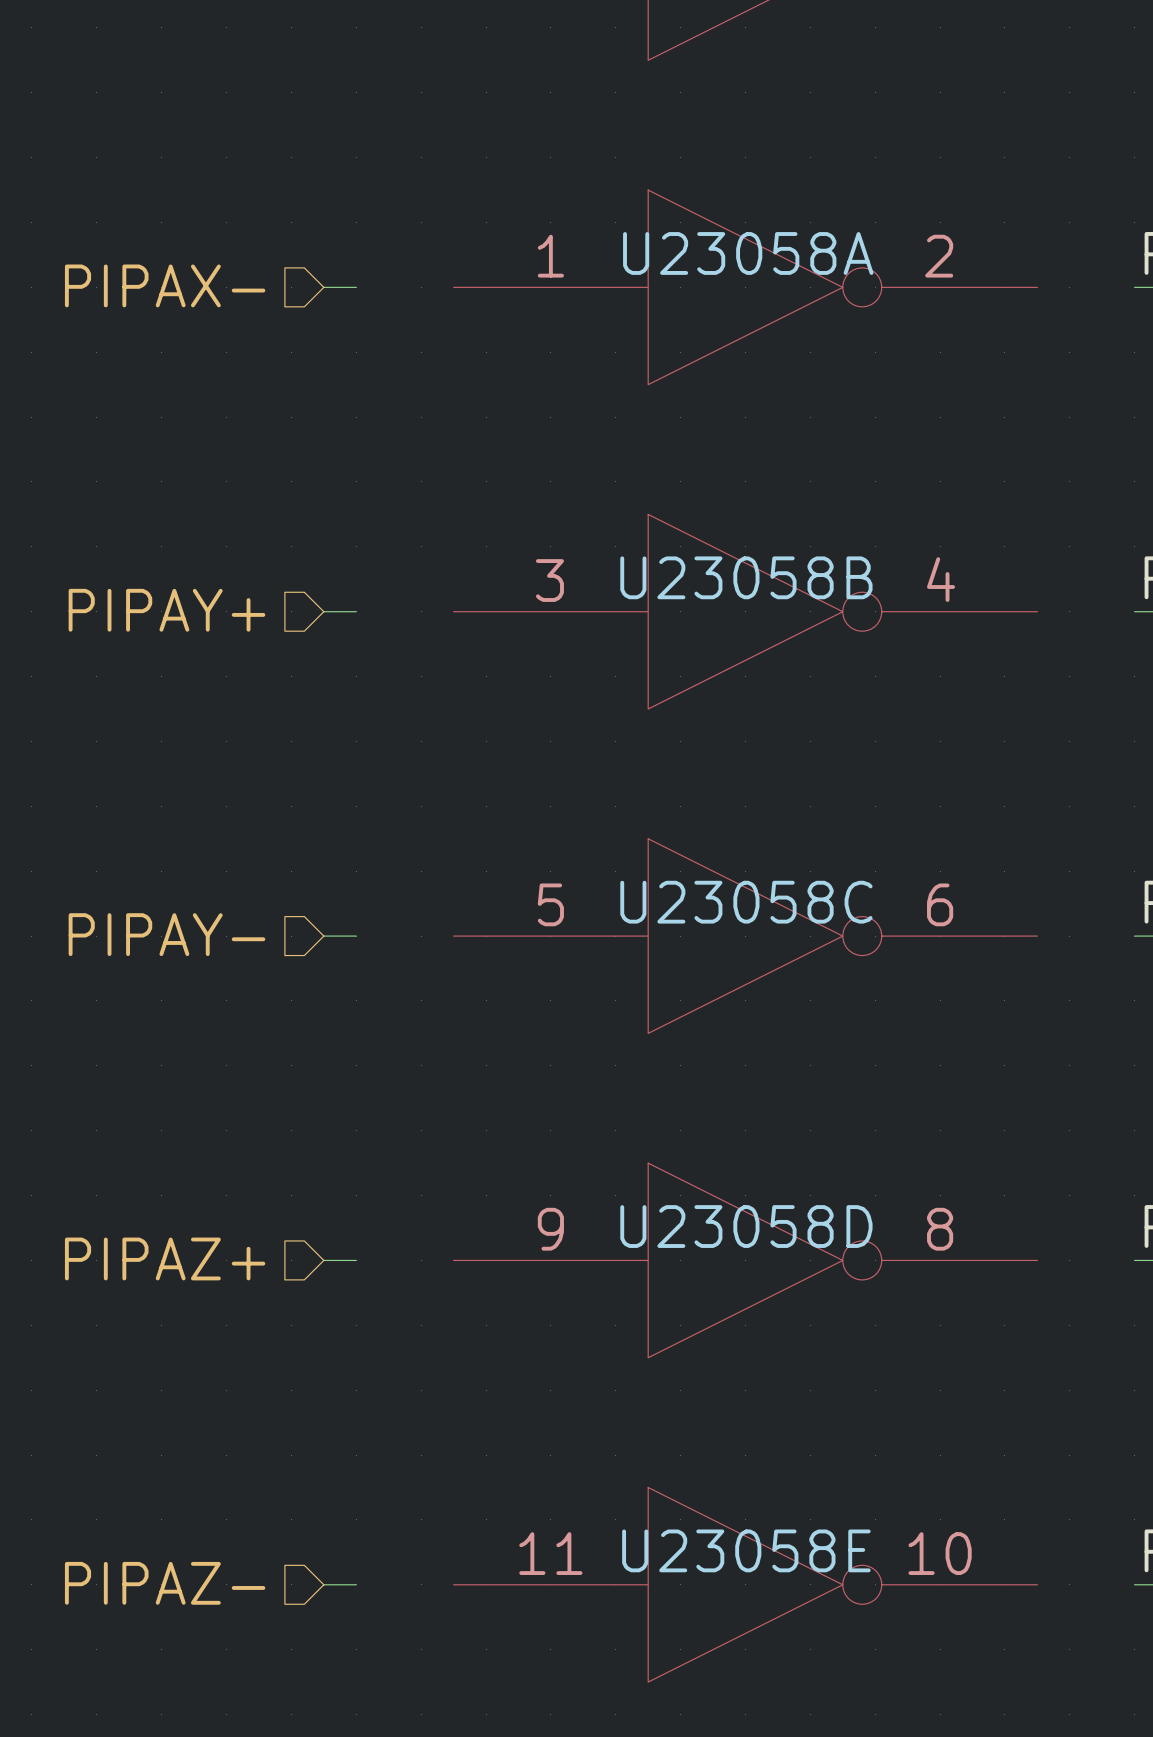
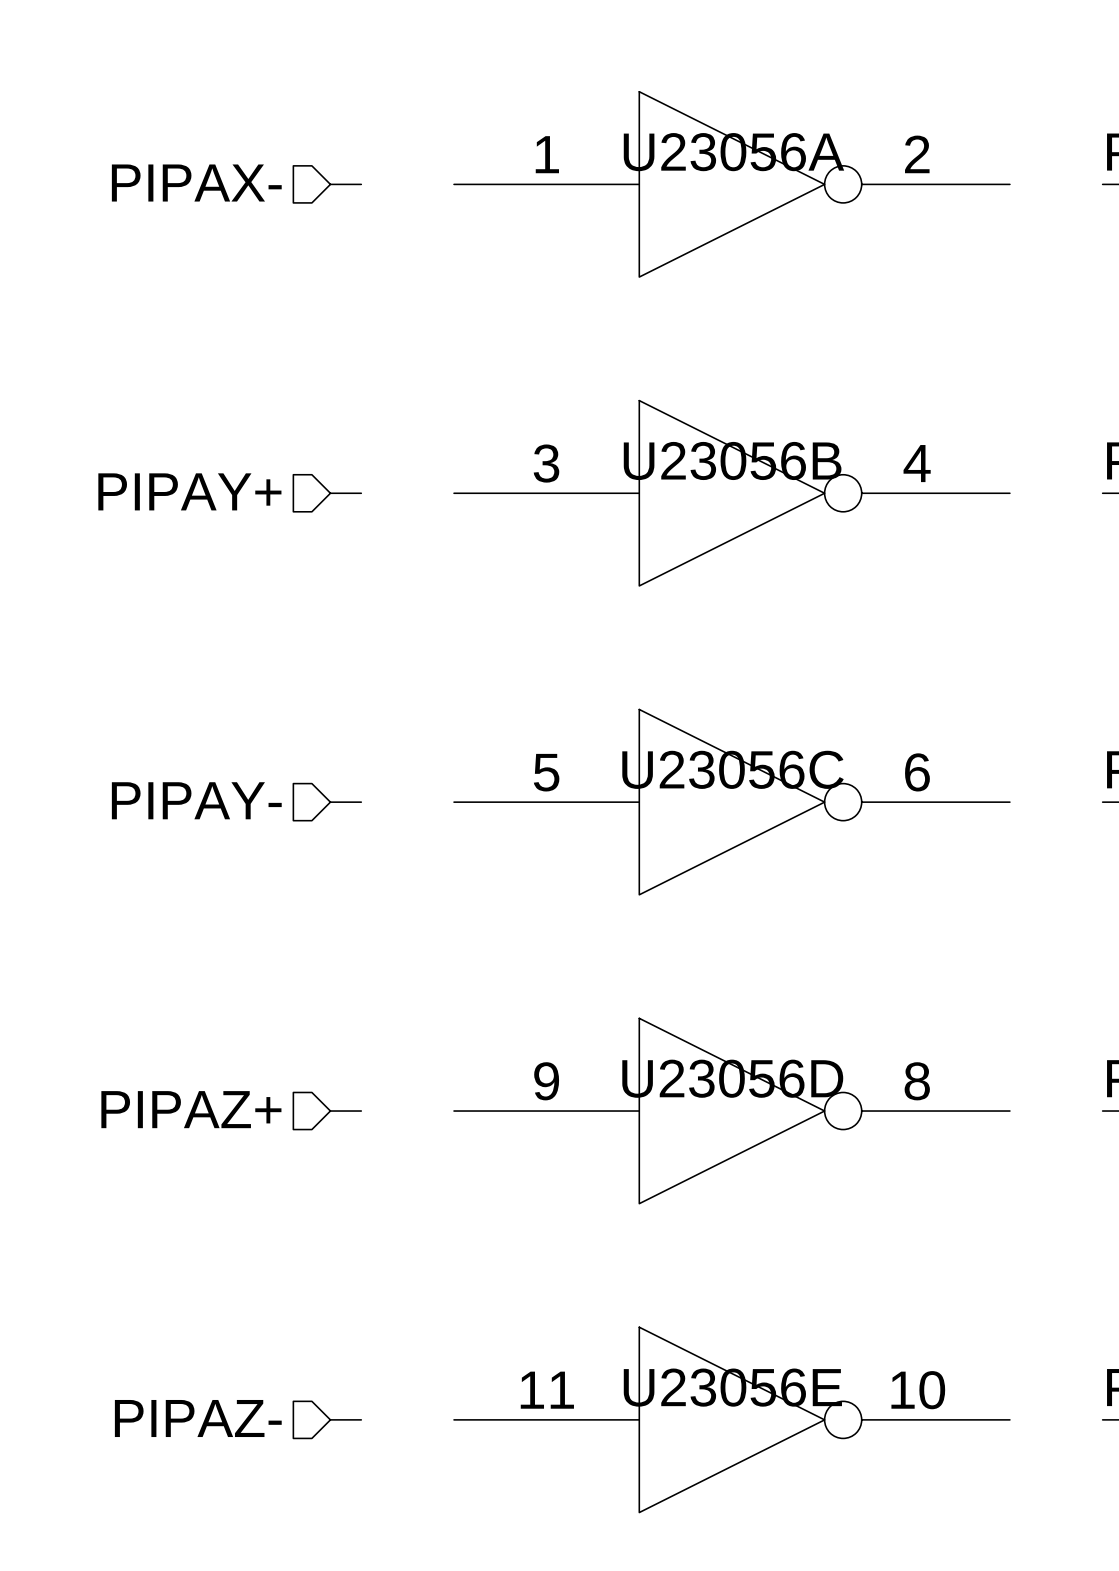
U23058A name: U23058A (748, 253) -> U23056A (733, 152)
U23058B name: U23058B (746, 577) -> U23056B (732, 460)
U23058C name: U23058C (746, 902) -> U23056C (733, 769)
U23058D name: U23058D (746, 1226) -> U23056D (732, 1078)
U23058E name: U23058E (746, 1550) -> U23056E (732, 1387)

